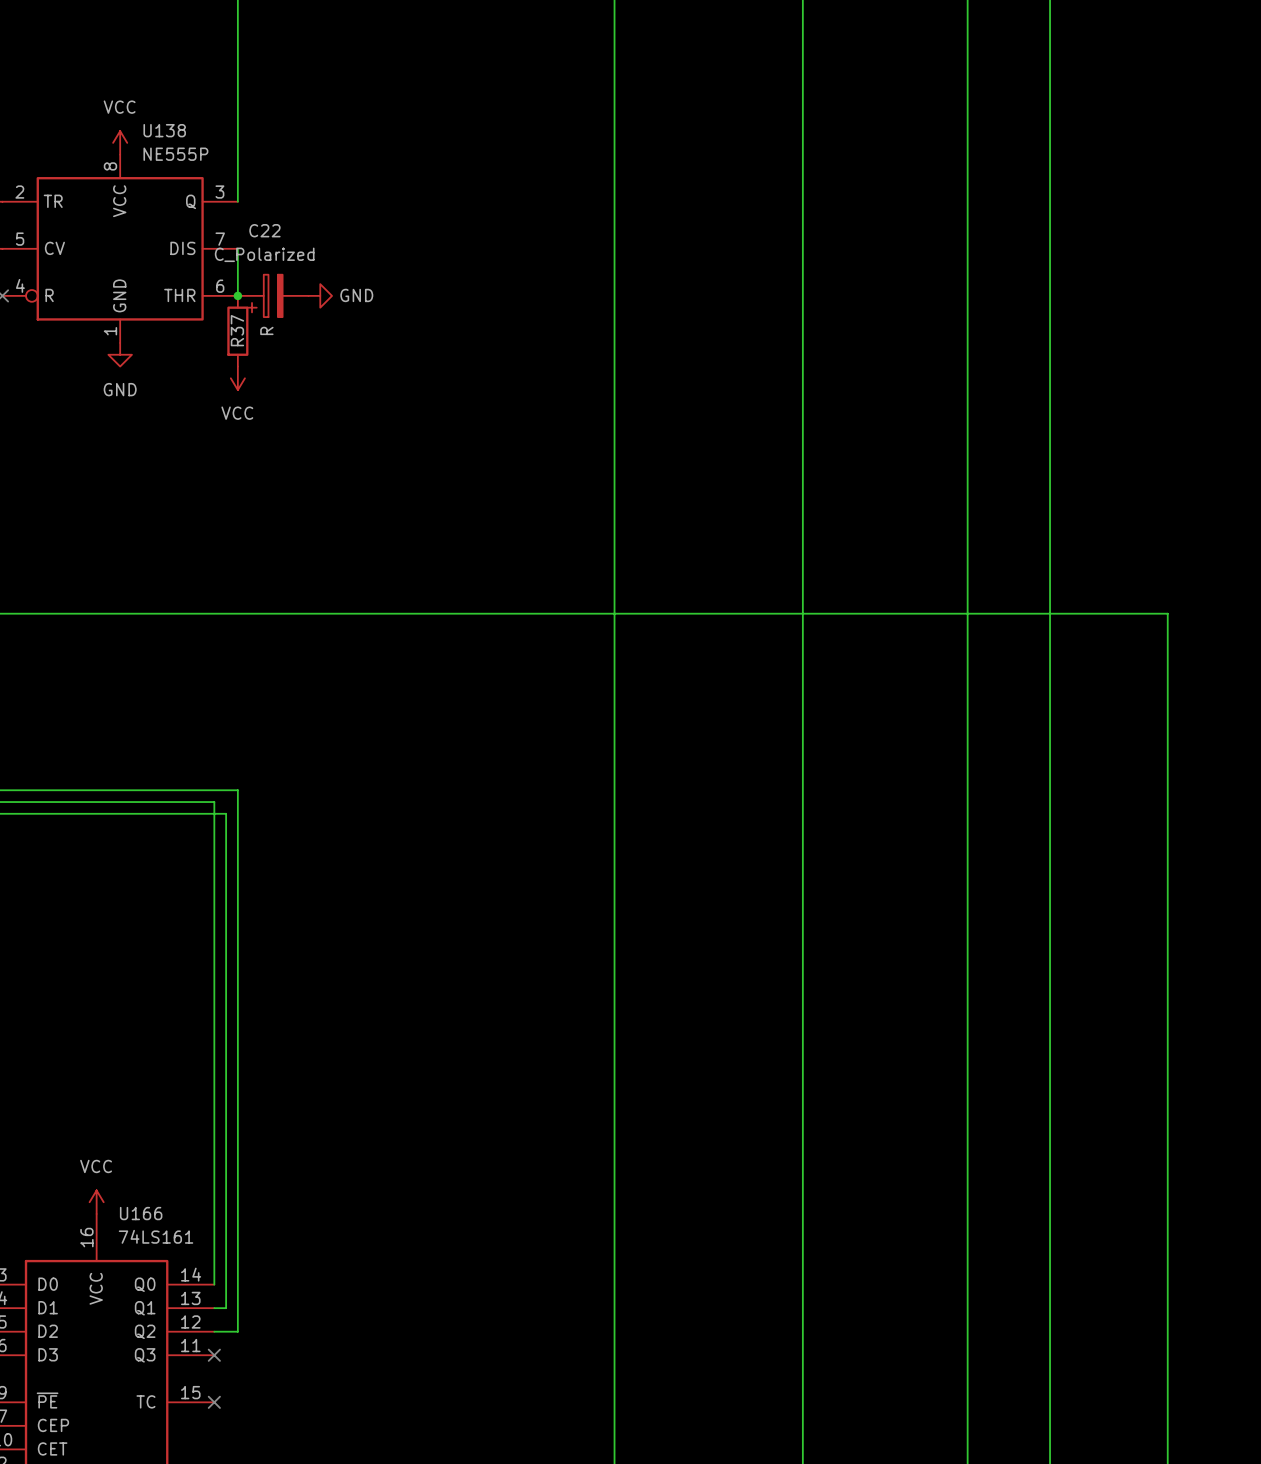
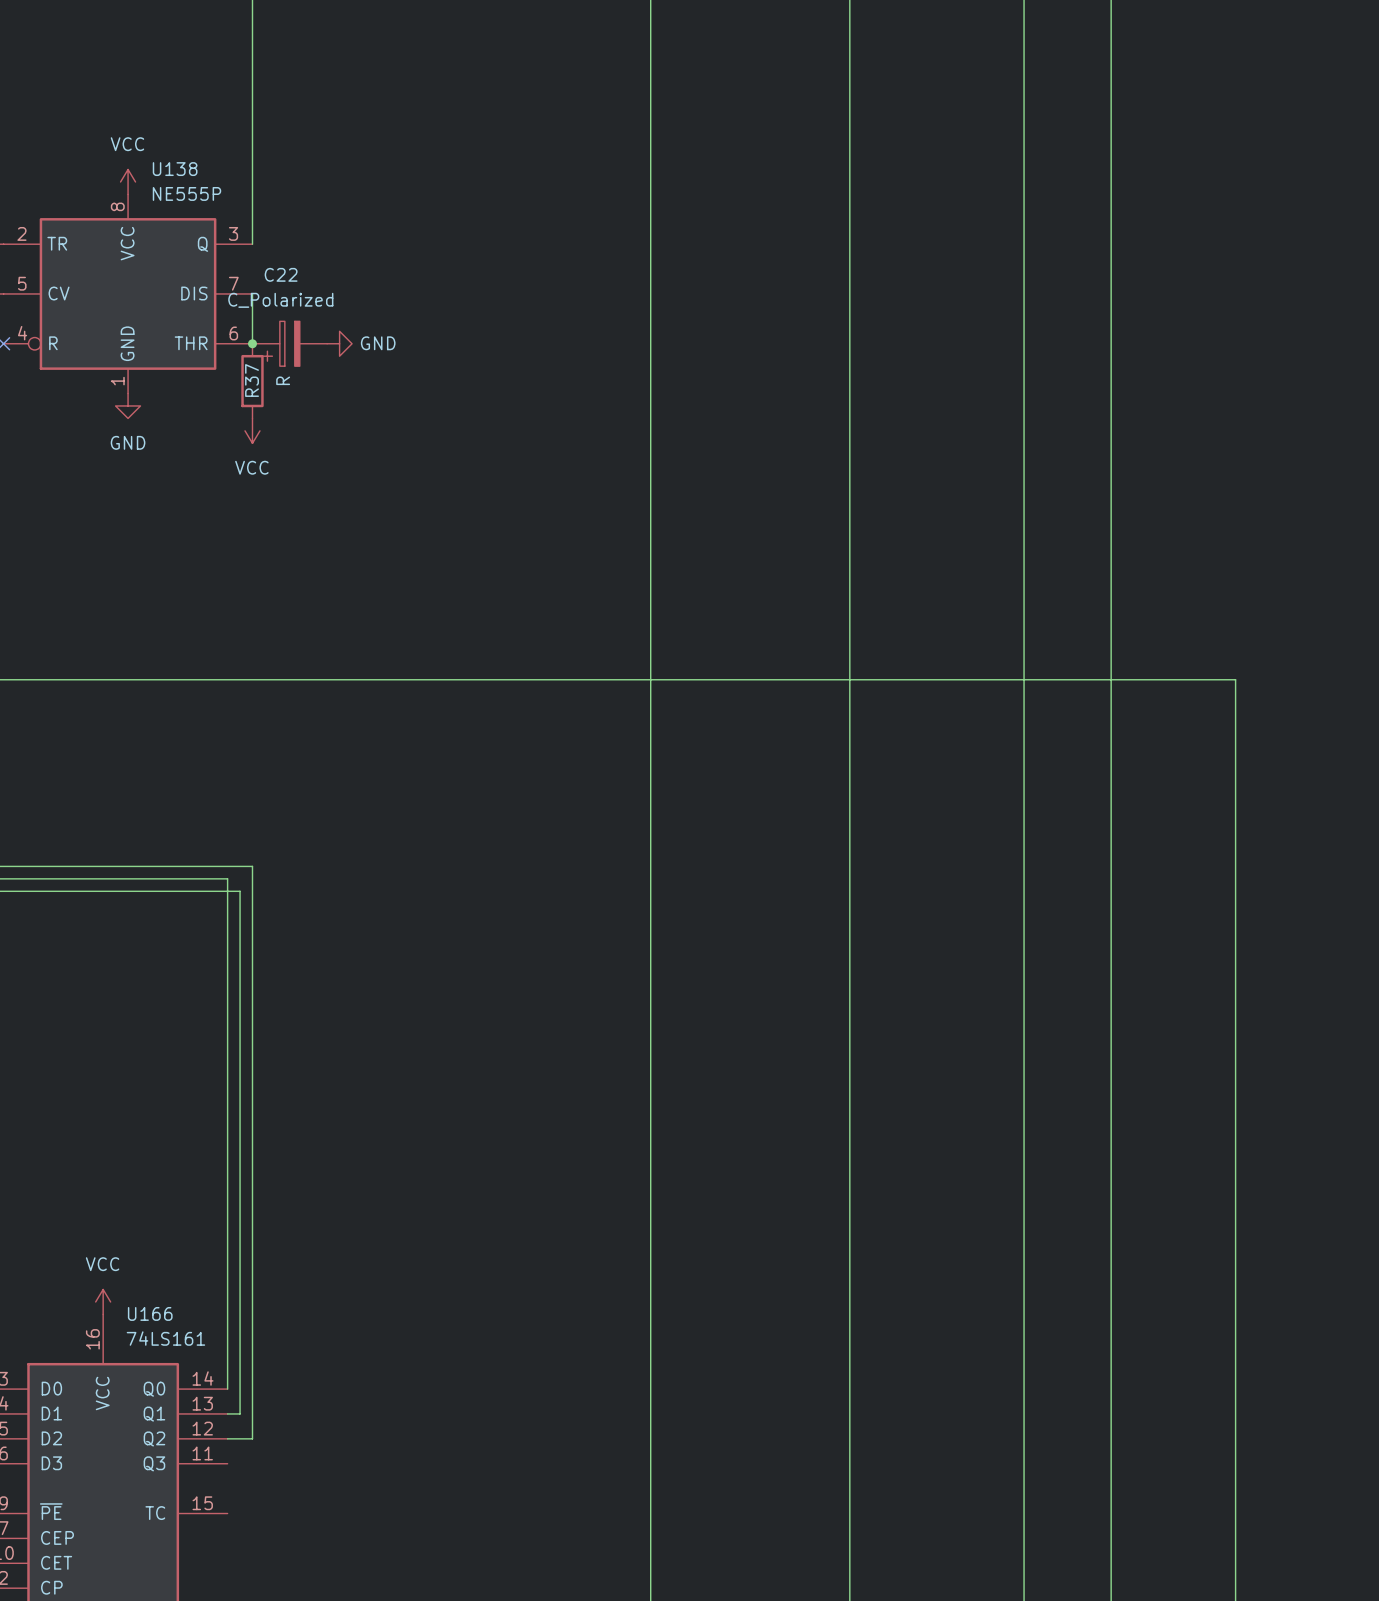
no-connect mark: (214, 1355) -> none
no-connect mark: (214, 1402) -> none

